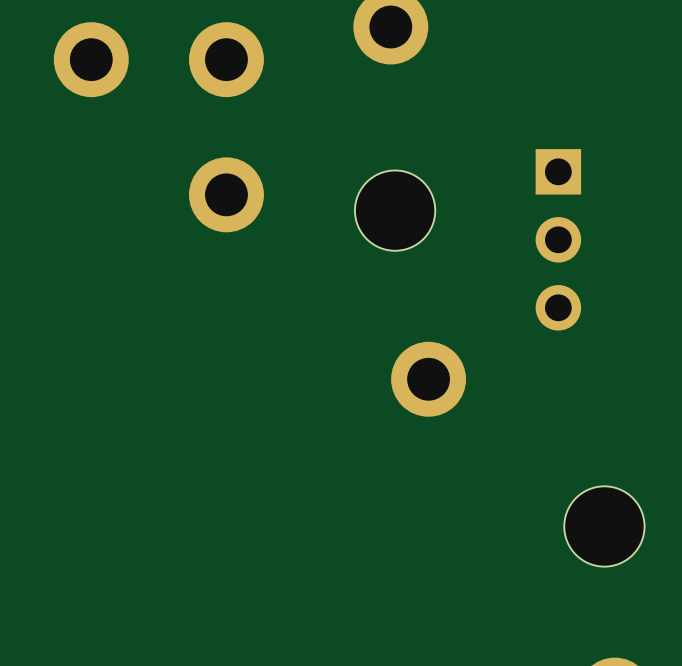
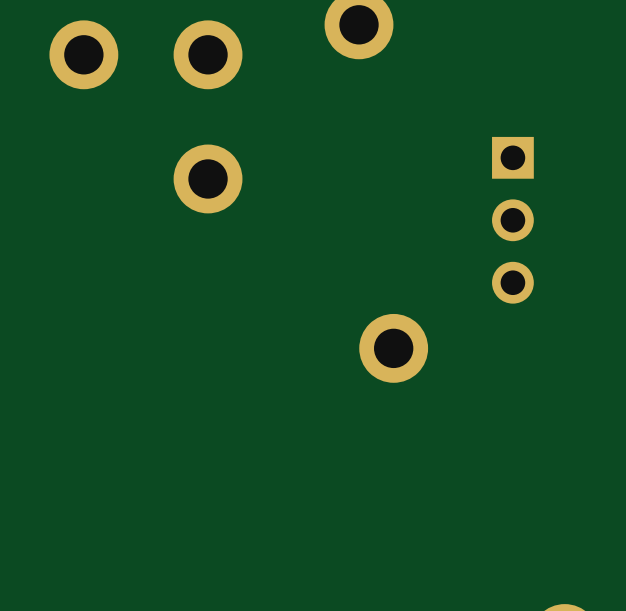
part: (395, 210) -> none
part: (604, 526) -> none

